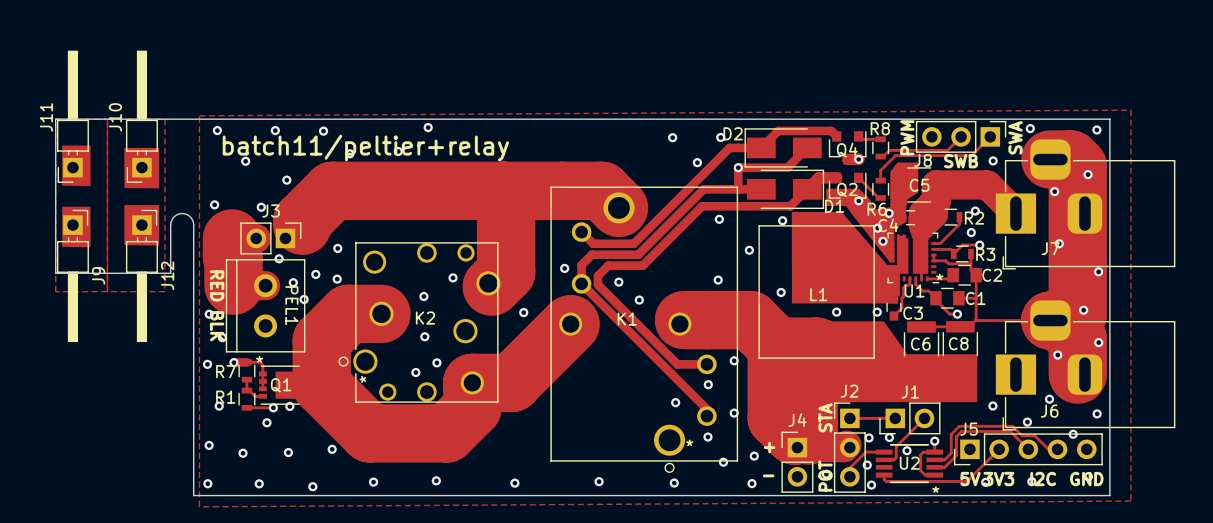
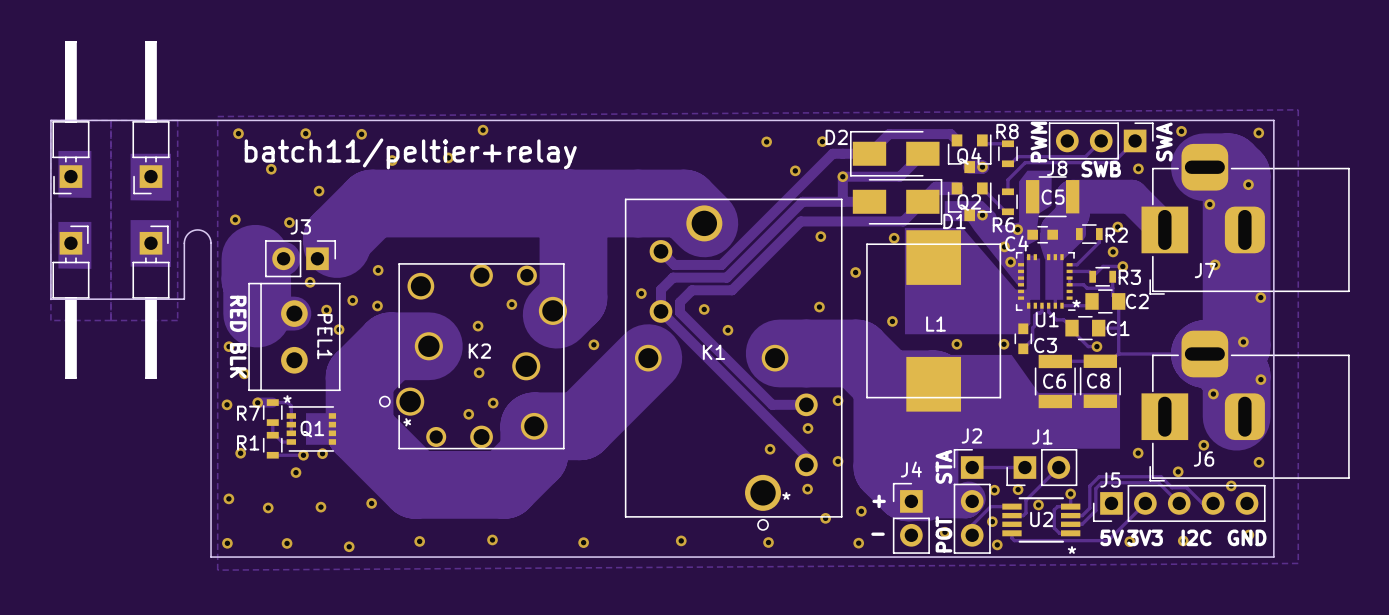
J11 name: J11 (46, 117) -> none
J10 name: J10 (115, 117) -> none
J9 name: J9 (98, 275) -> none
J12 name: J12 (167, 275) -> none

